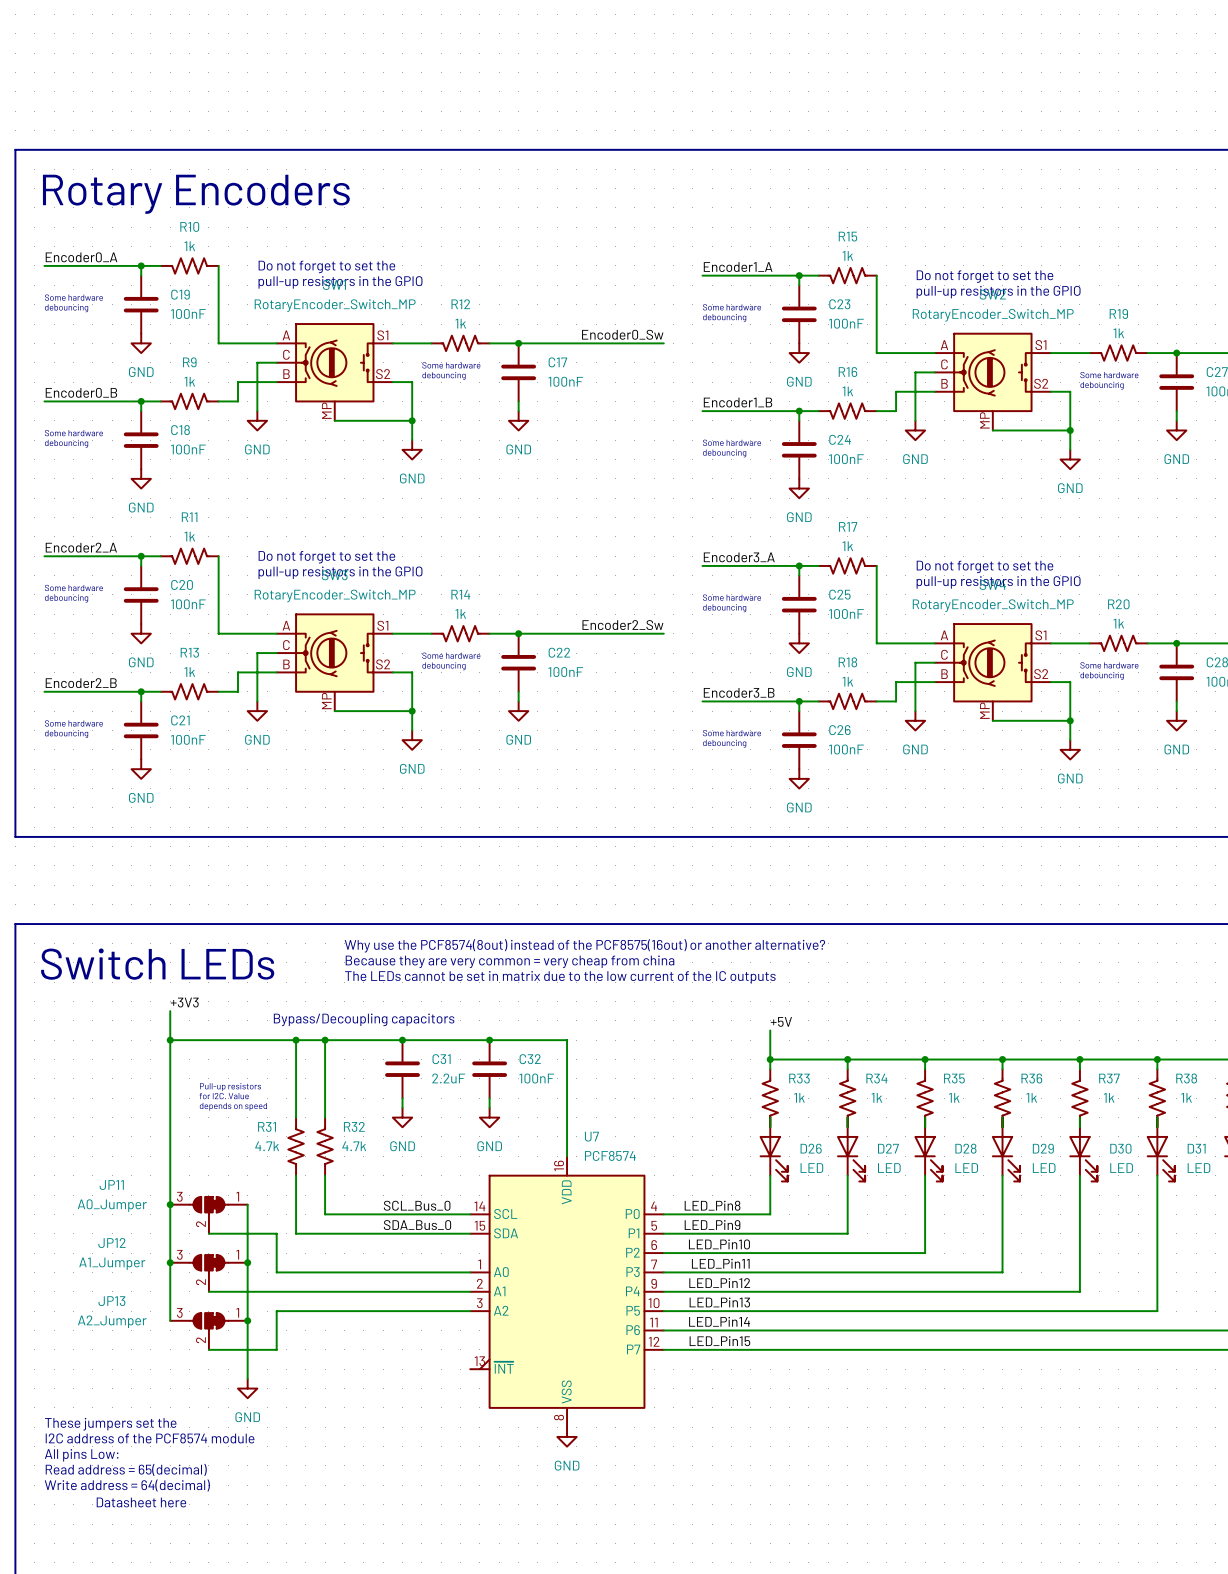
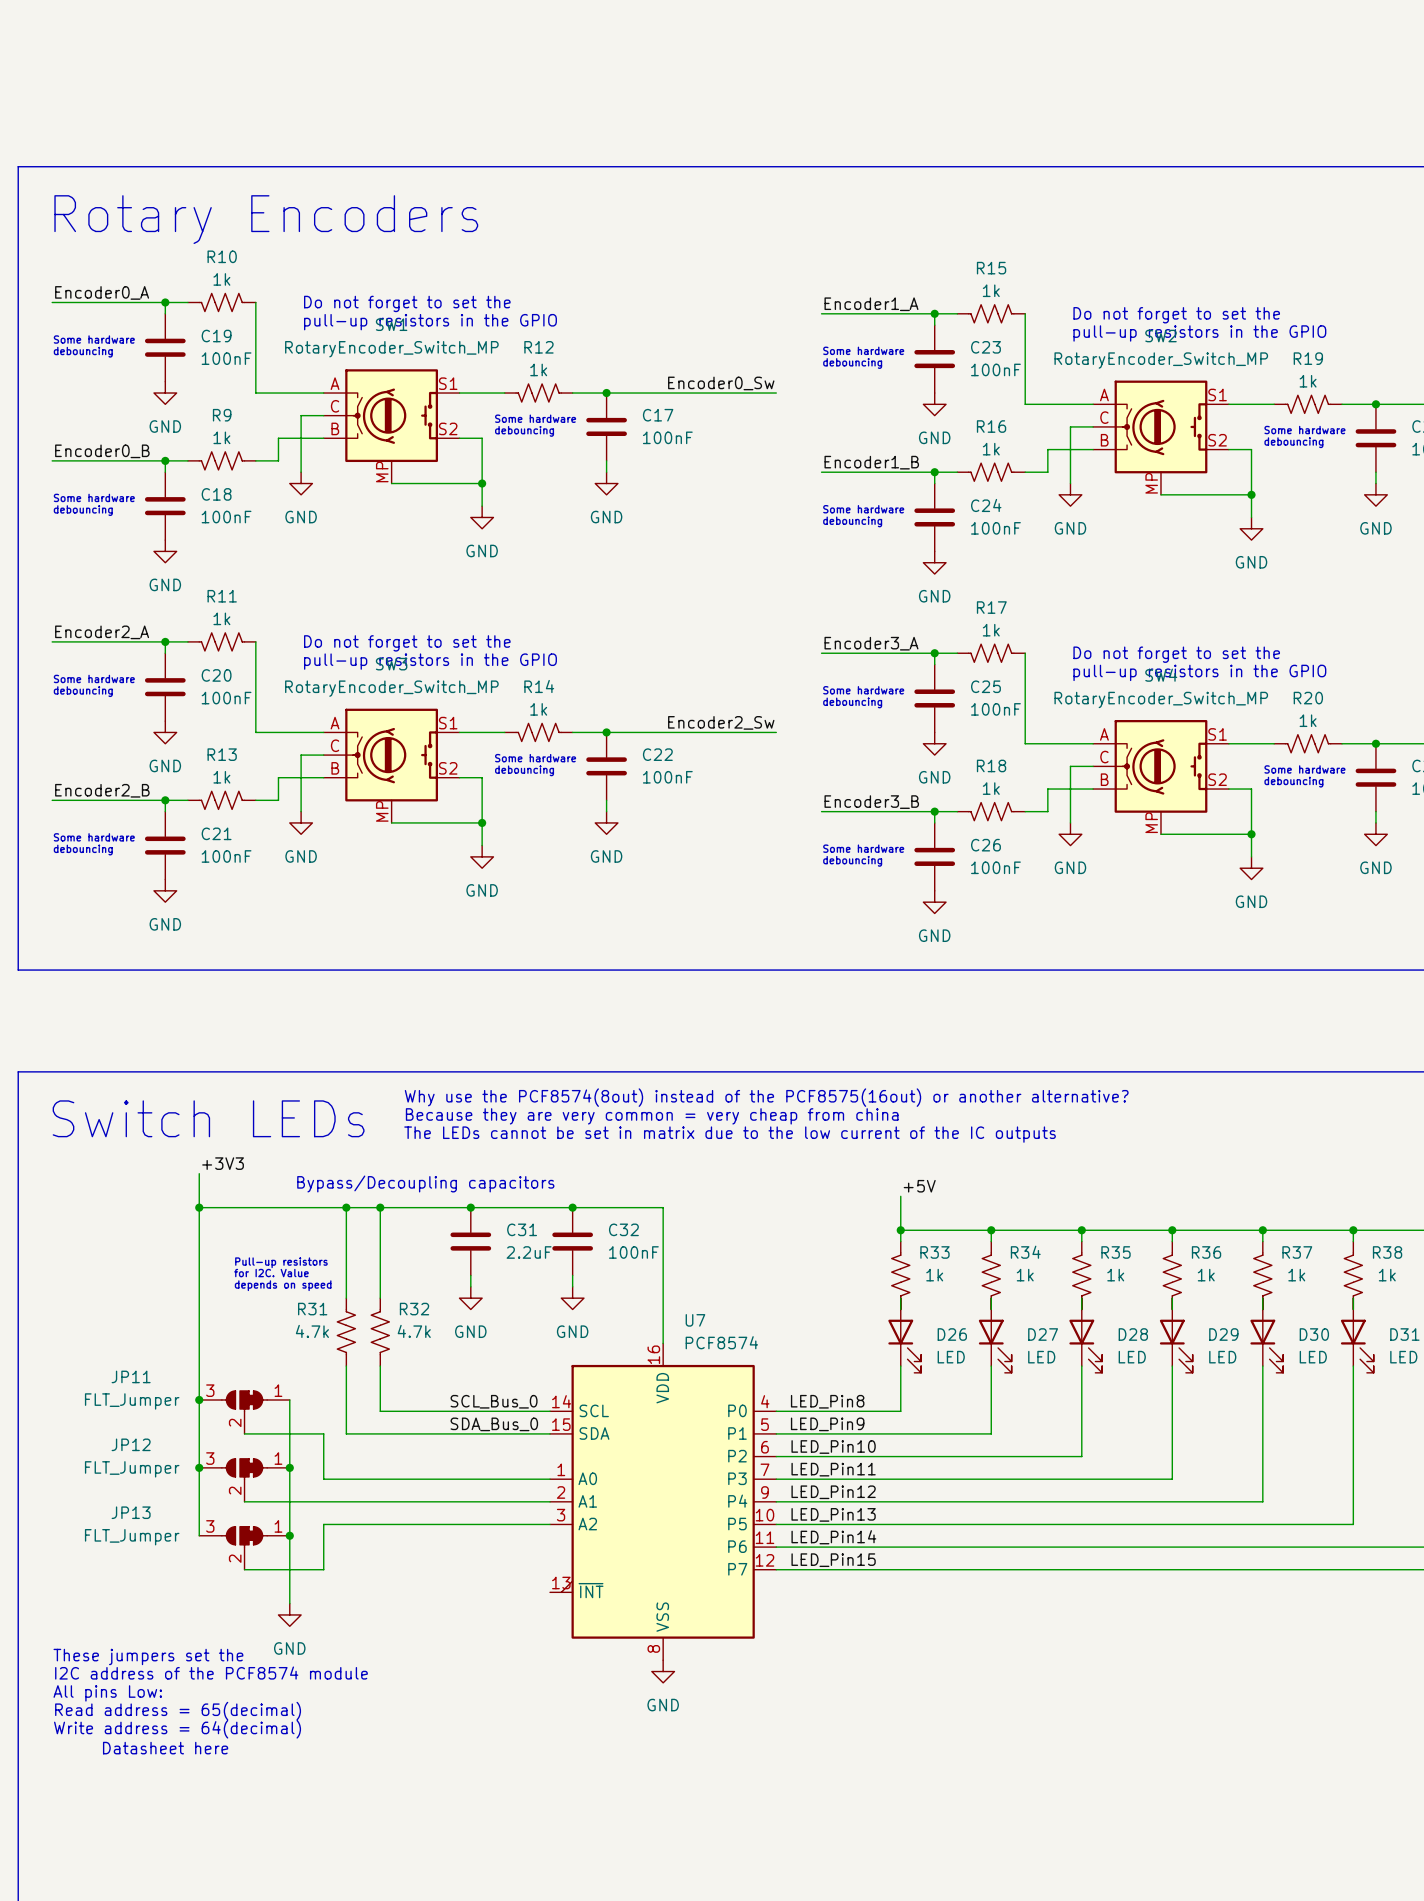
JP11 value: A0_Jumper (112, 1205) -> FLT_Jumper (132, 1401)
JP12 value: A1_Jumper (112, 1263) -> FLT_Jumper (132, 1469)
JP13 value: A2_Jumper (112, 1321) -> FLT_Jumper (132, 1537)

